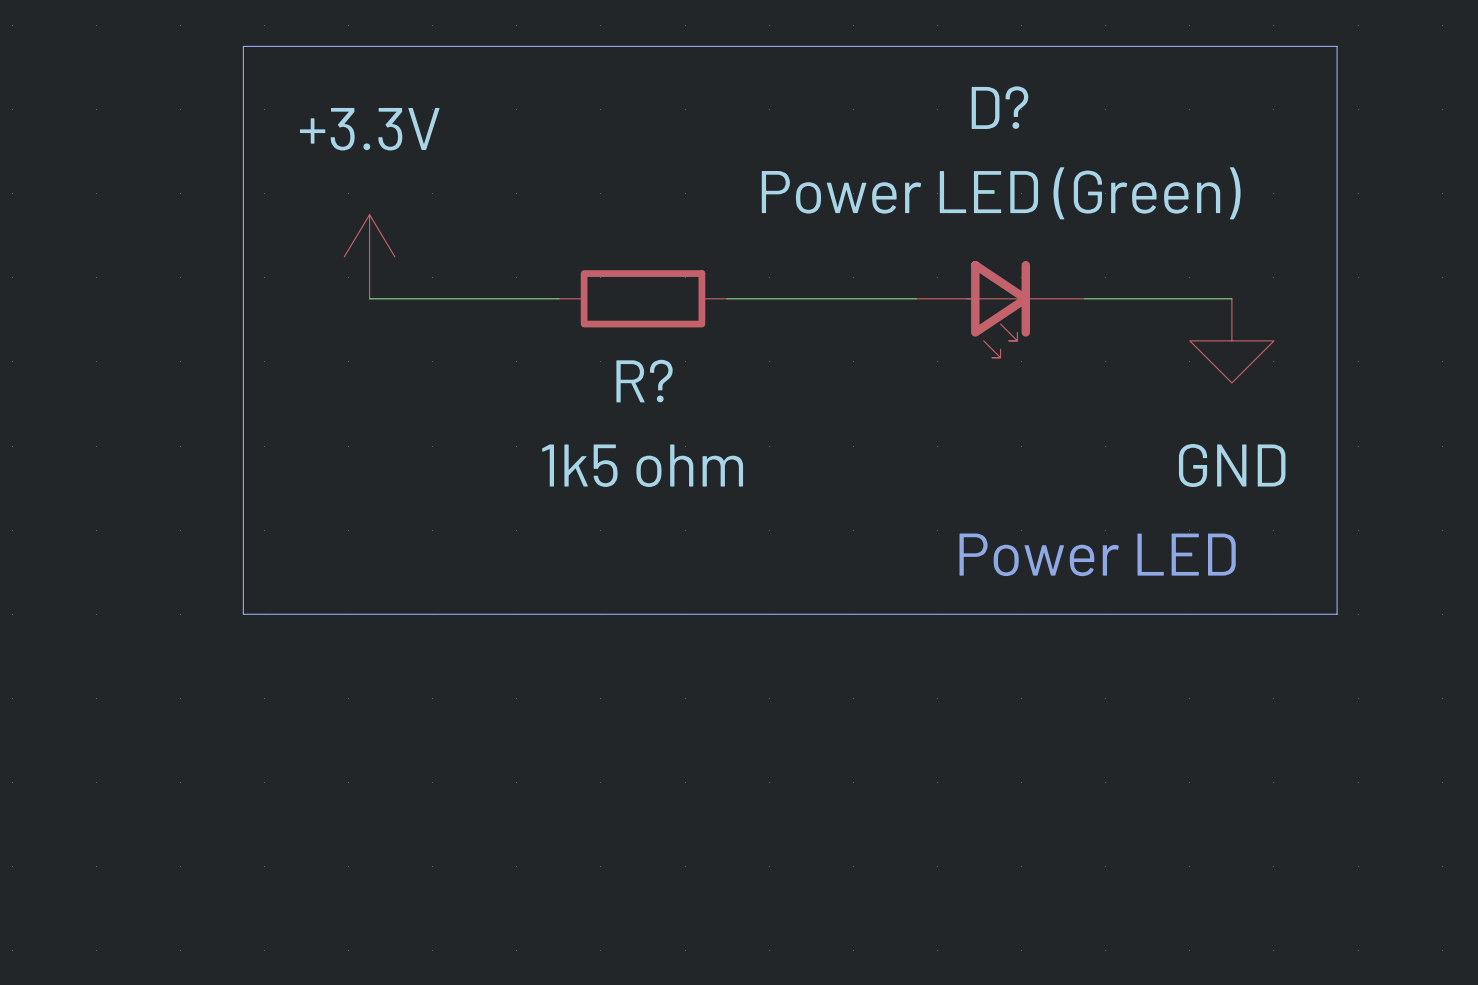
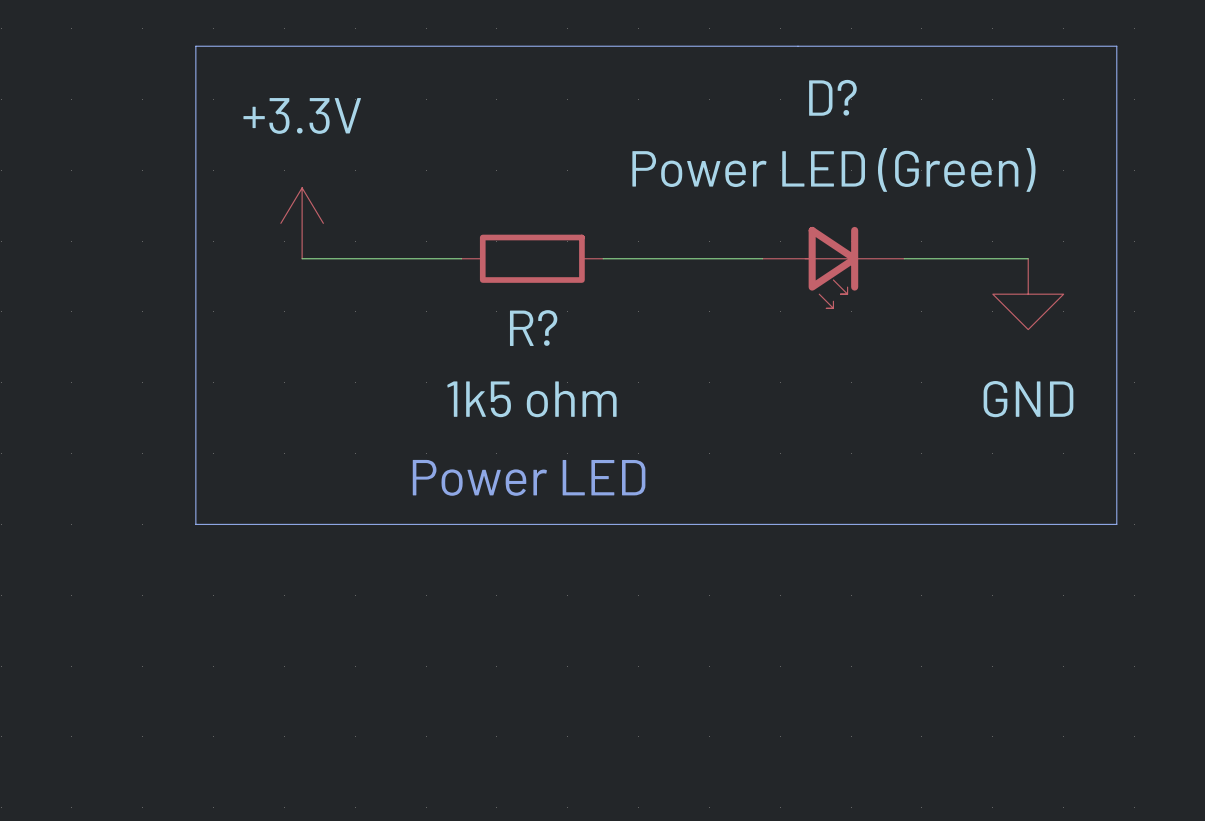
text position: Power LED (1097, 554) -> Power LED (529, 477)

